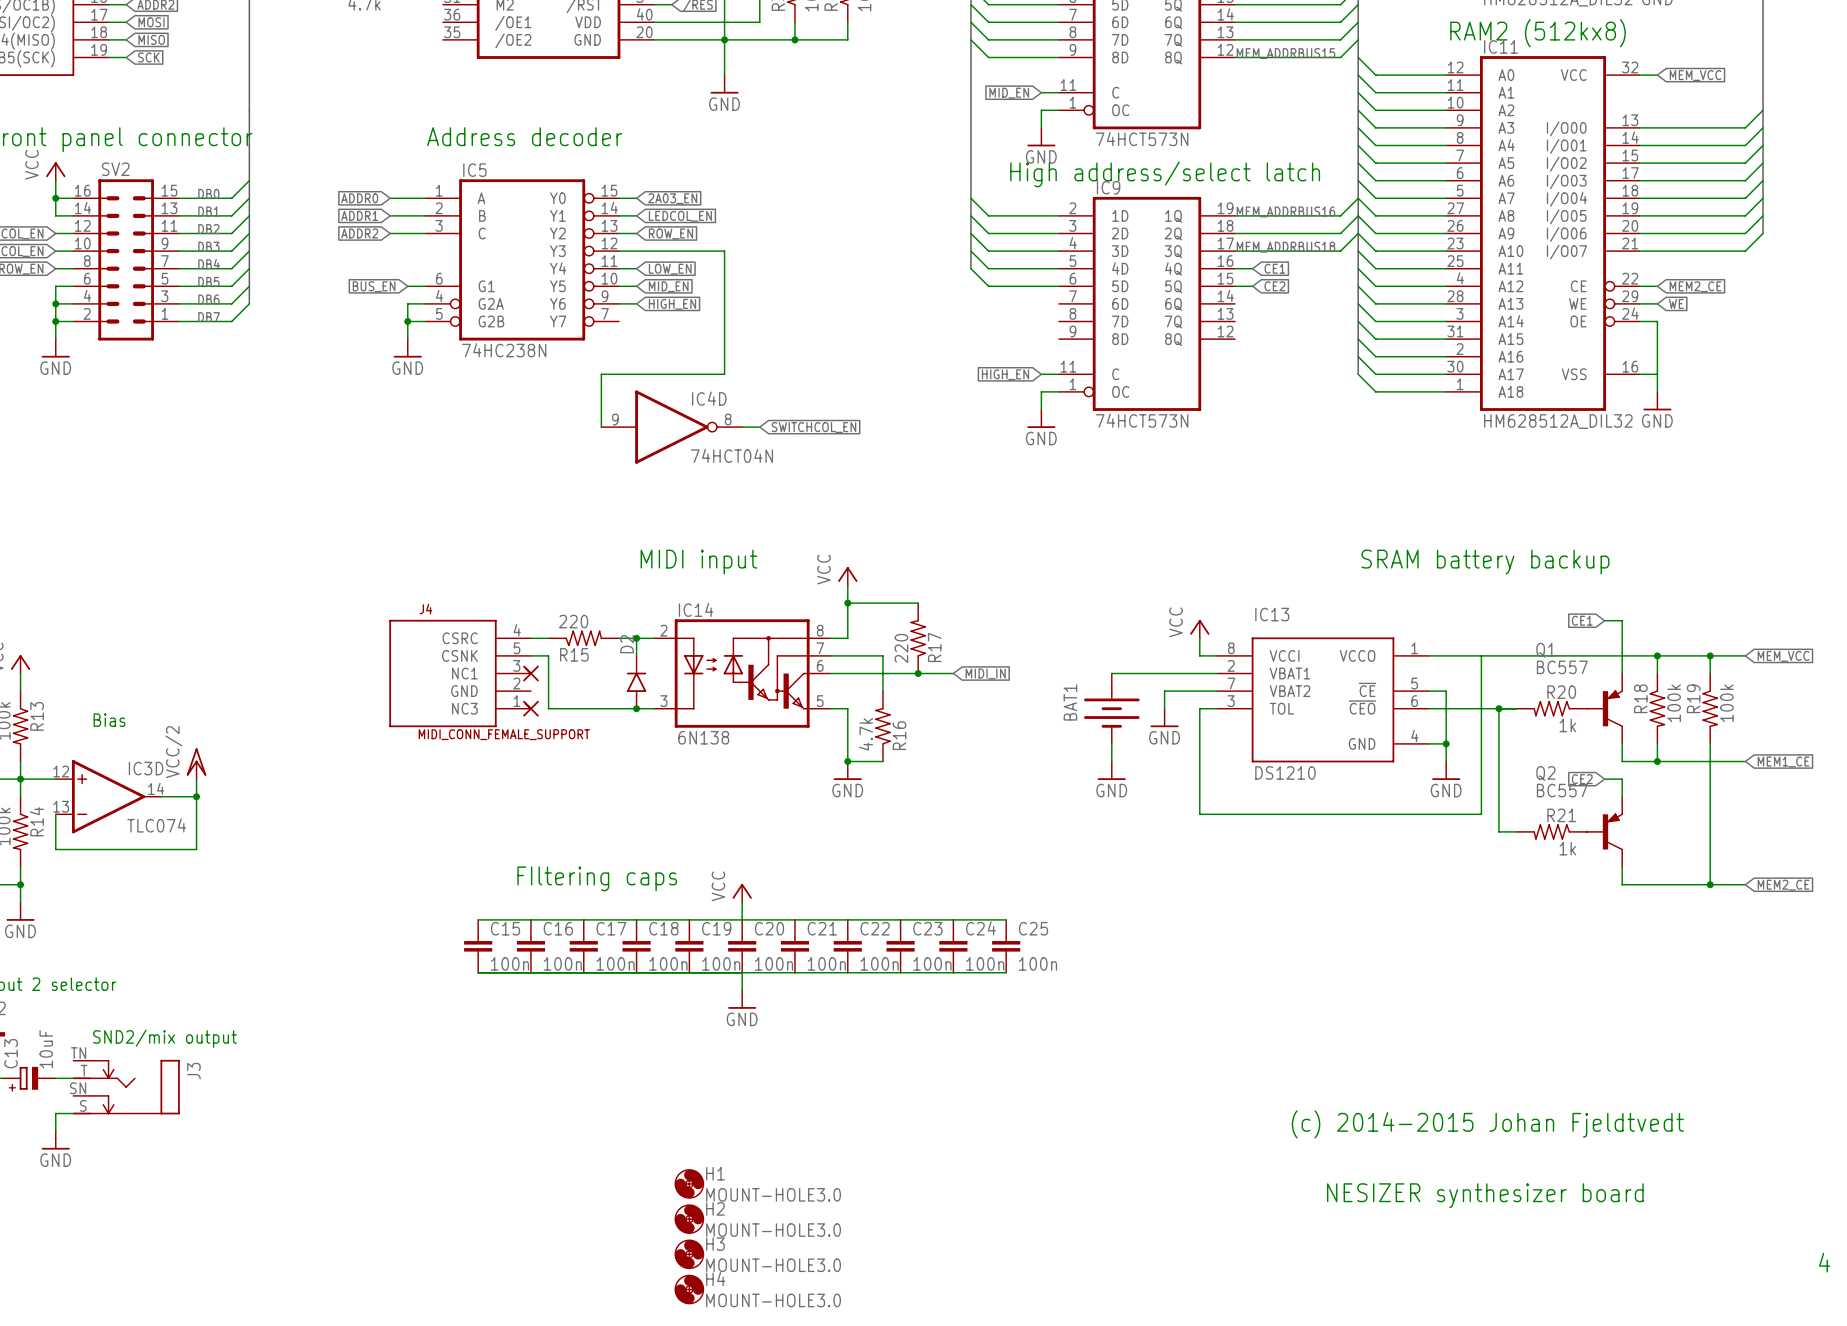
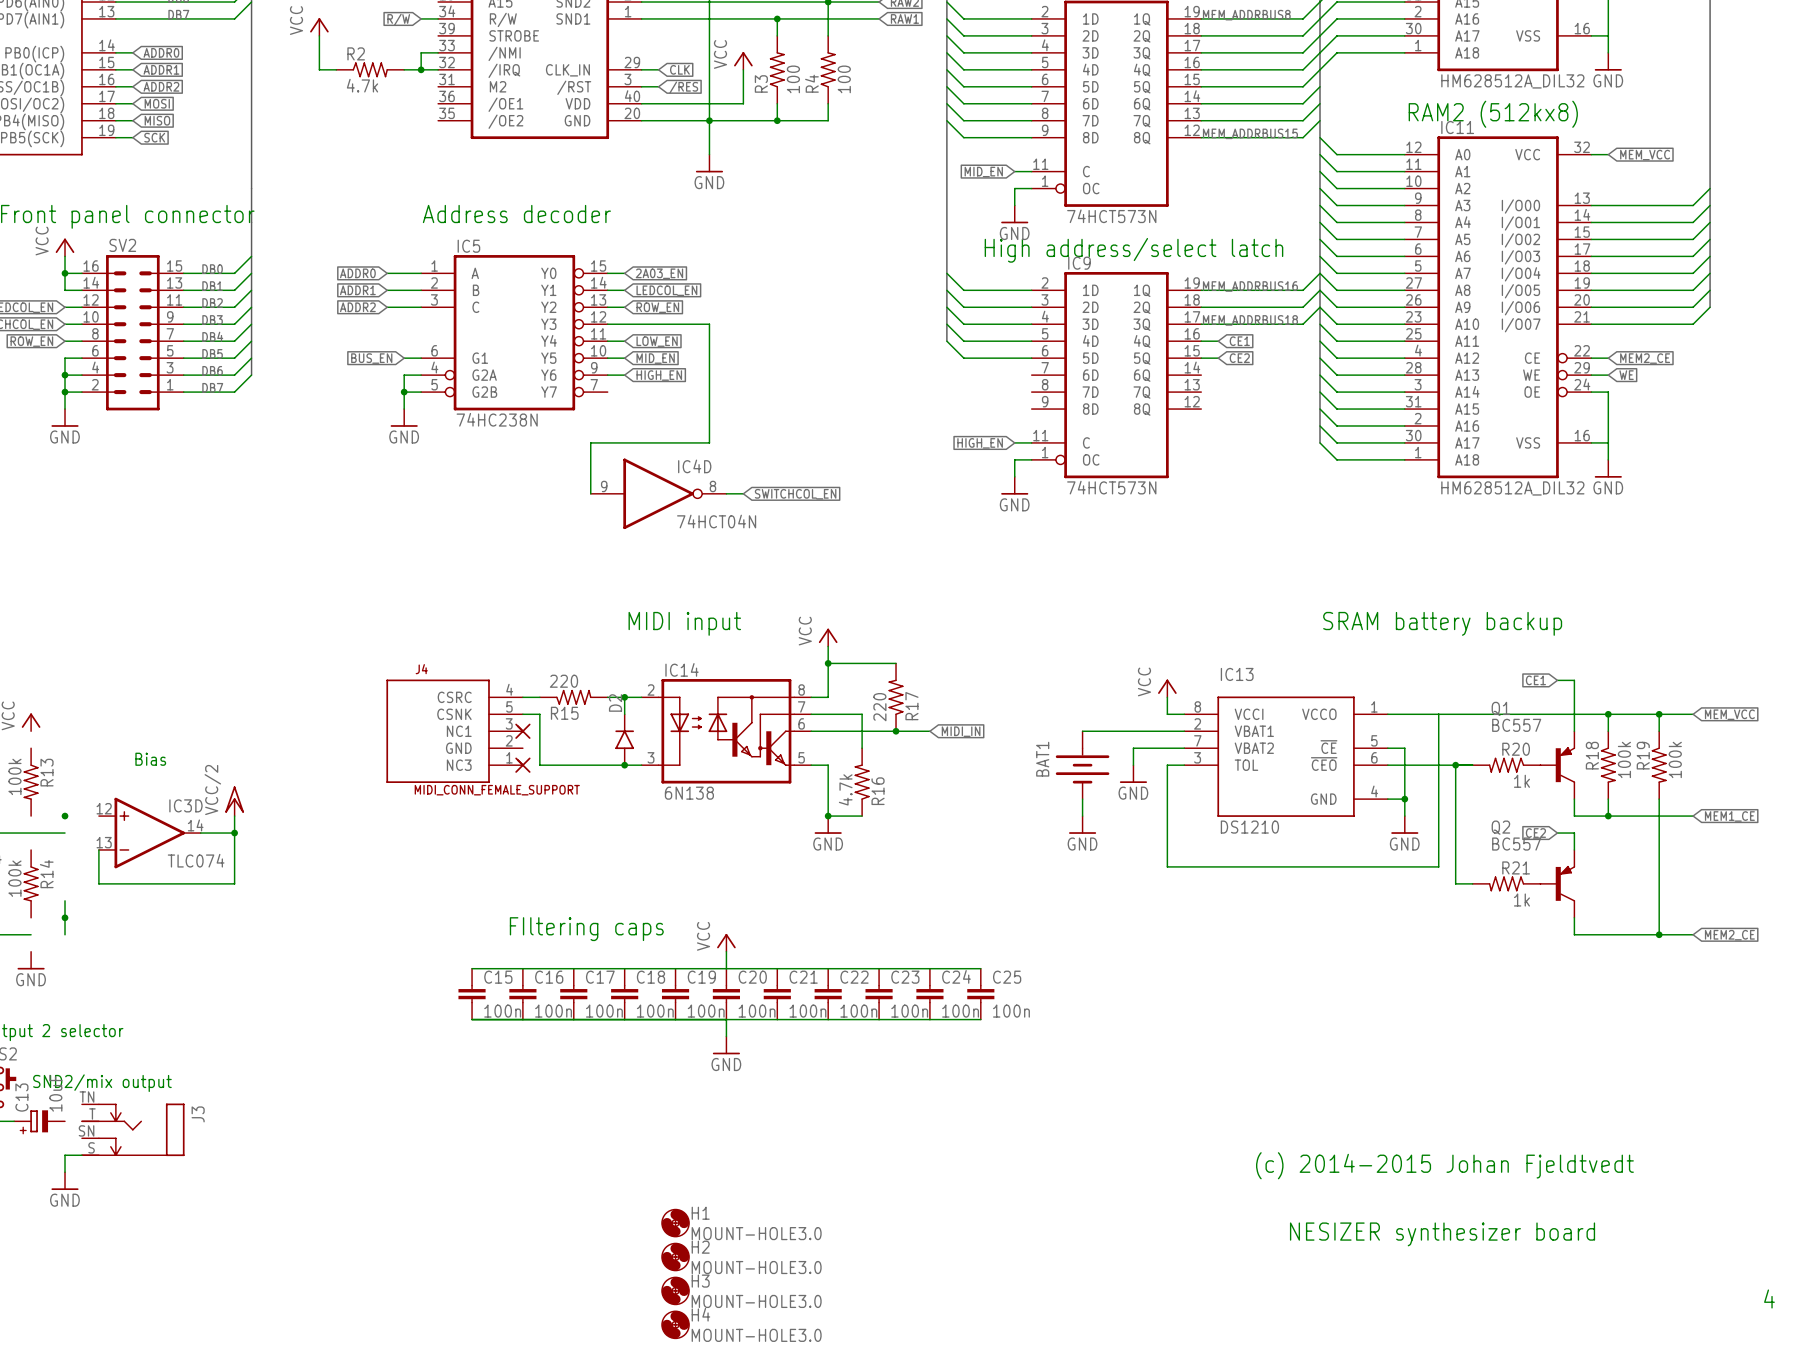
wire: (20, 673) (20, 691) -> none
text position: Bias (109, 720) -> Bias (150, 759)
wire: (20, 761) (20, 796) -> none
wire: none -> (234, 816) (234, 883) (98, 883) (98, 849)
power symbol position: VCC/2 (196, 763) -> VCC/2 (234, 801)
junction position: (20, 779) -> (65, 816)
wire: (196, 779) (196, 849) (55, 849) (55, 814) -> (200, 833) (234, 833)
IC3D position: (108, 796) -> (149, 833)
wire: (161, 796) (196, 796) -> none
junction position: (196, 796) -> (234, 833)
wire: (20, 867) (20, 902) -> (65, 900) (65, 934)
junction position: (20, 884) -> (65, 917)
text position: SND2/mix output (164, 1038) -> SND2/mix output (102, 1083)
wire: (55, 1078) (73, 1078) -> none

